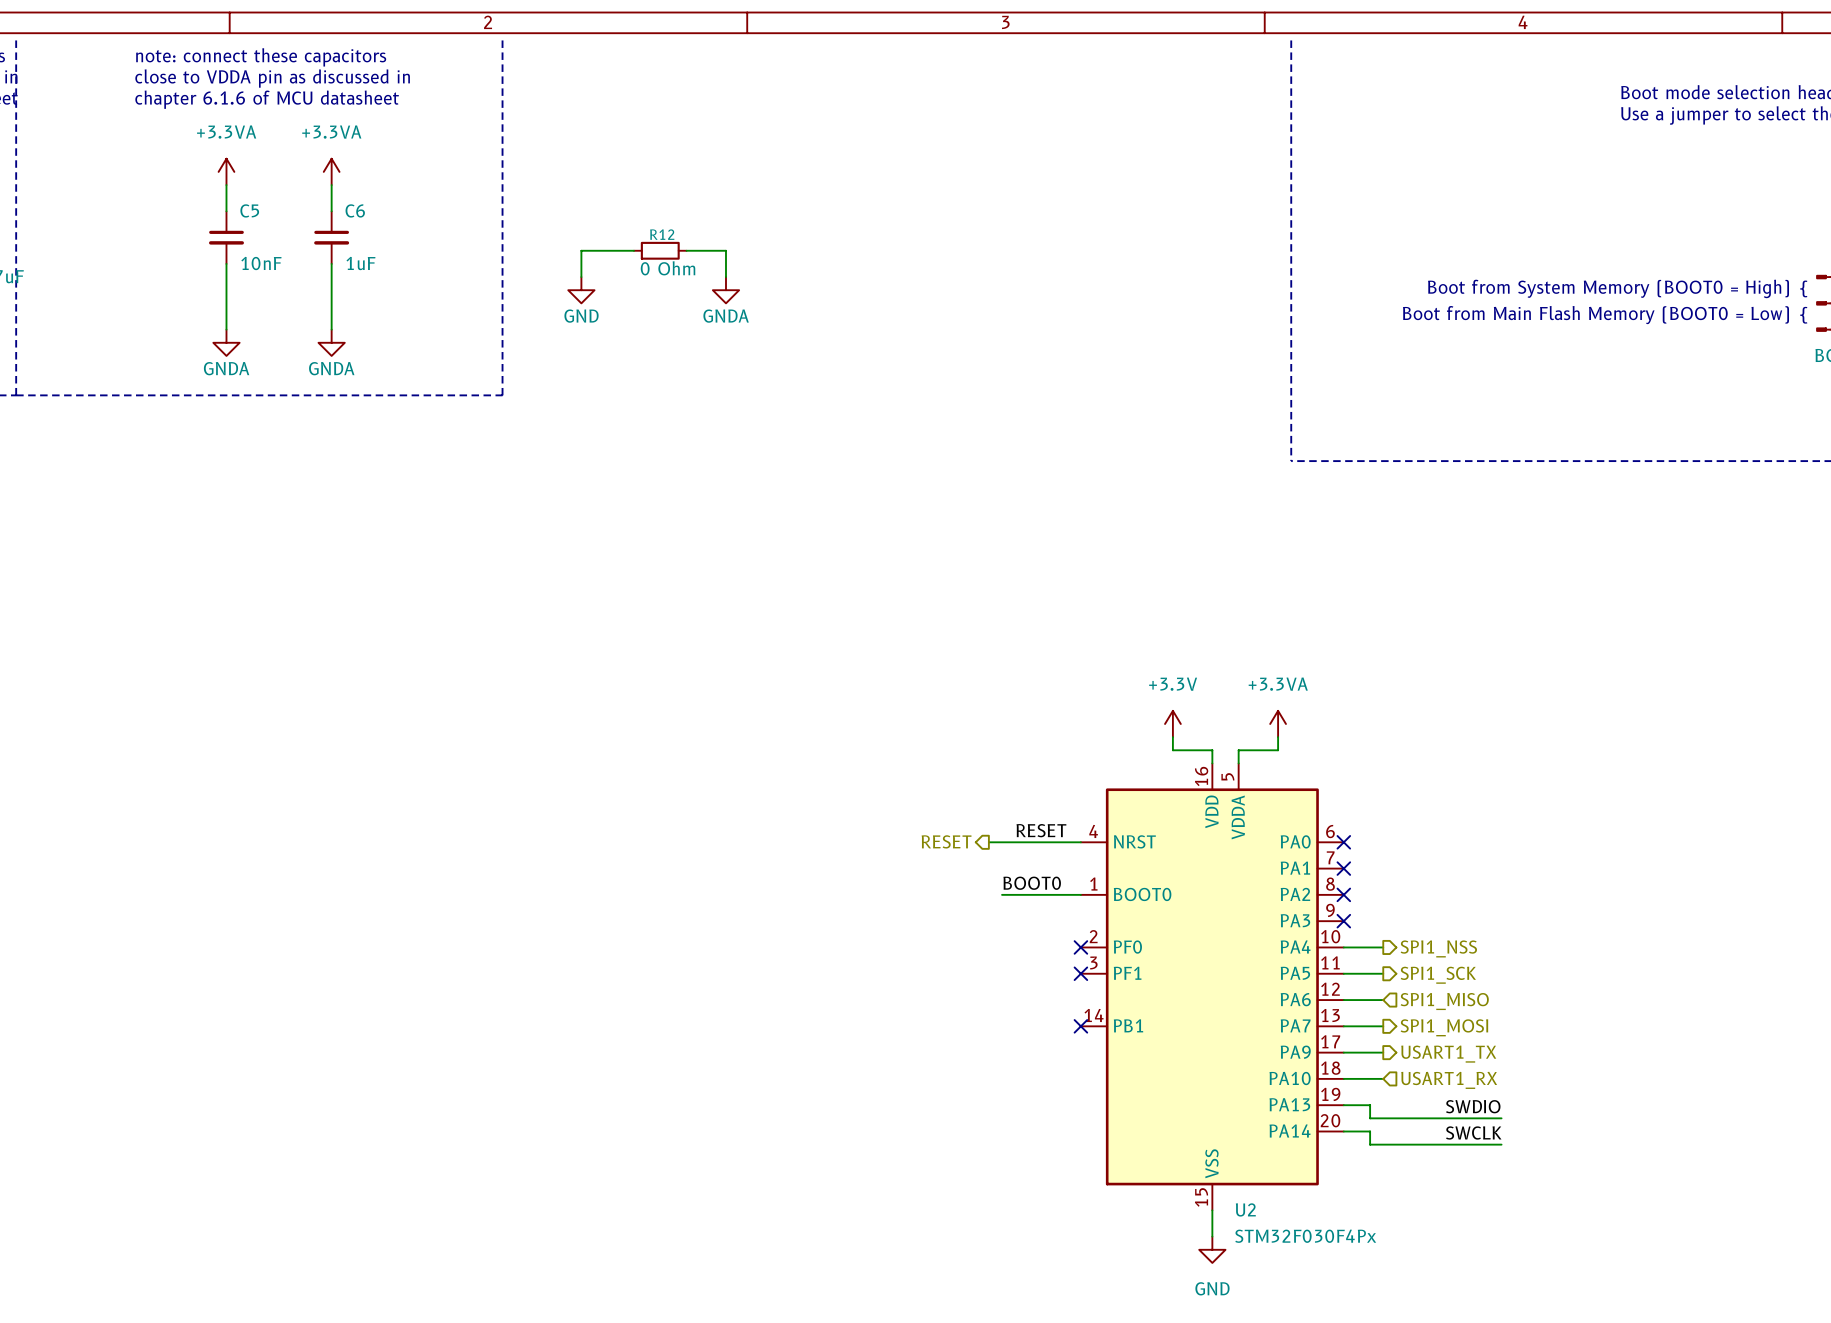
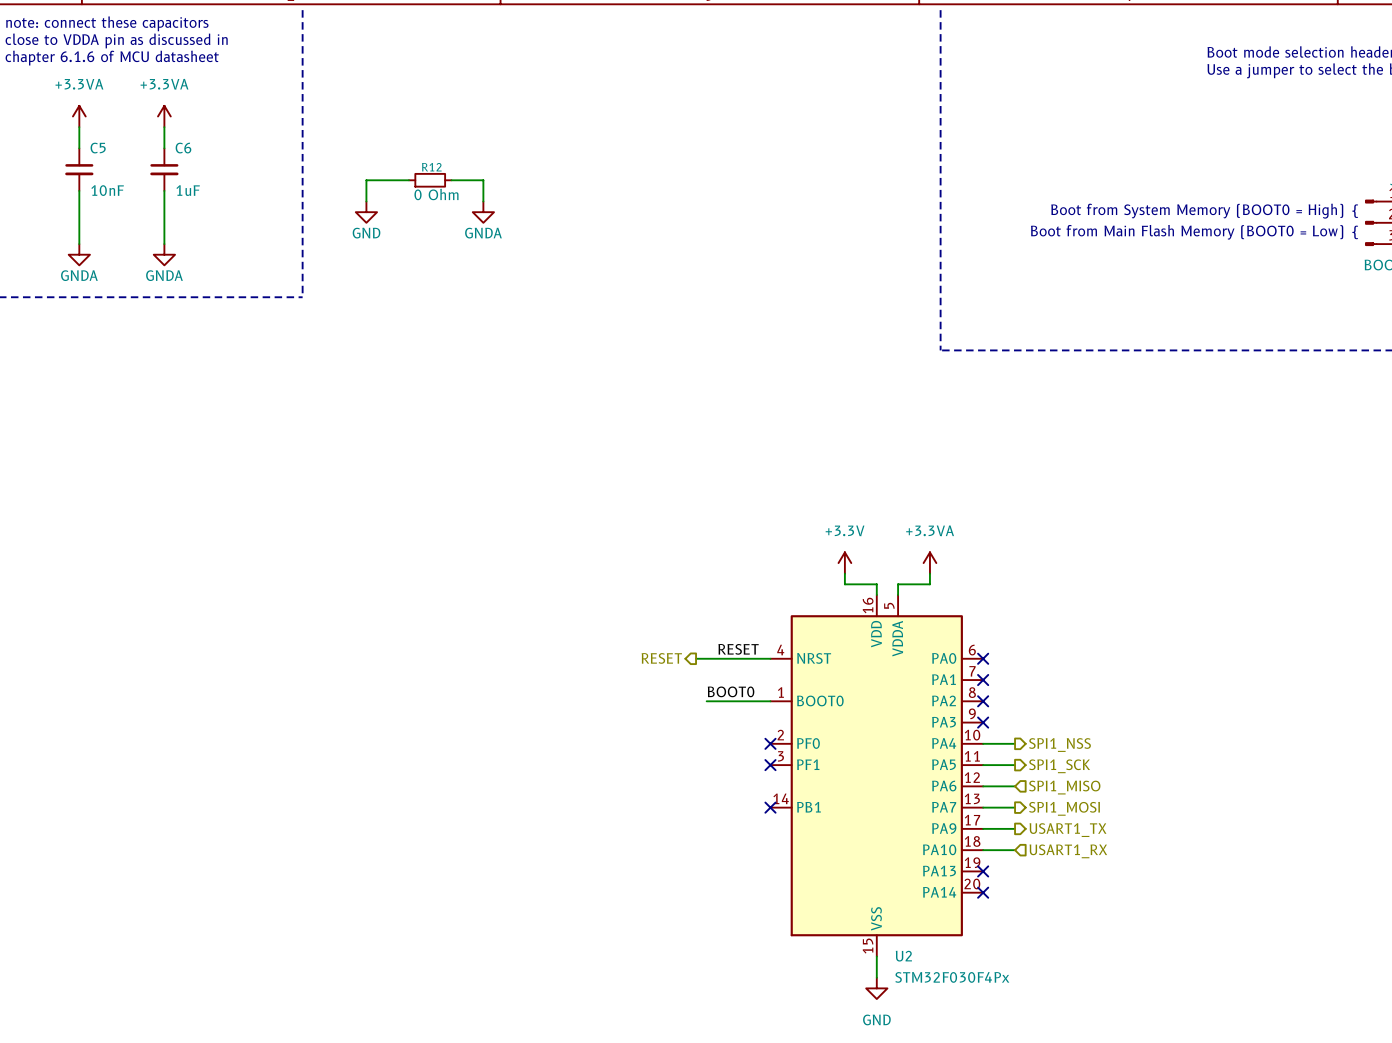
wire: (1343, 1105) (1370, 1105) (1370, 1118) (1501, 1118) -> none
no-connect mark: none -> (983, 871)
label: SWDIO (1473, 1106) -> none
wire: (1343, 1131) (1370, 1131) (1370, 1144) (1501, 1144) -> none
no-connect mark: none -> (983, 892)
label: SWCLK (1473, 1132) -> none

